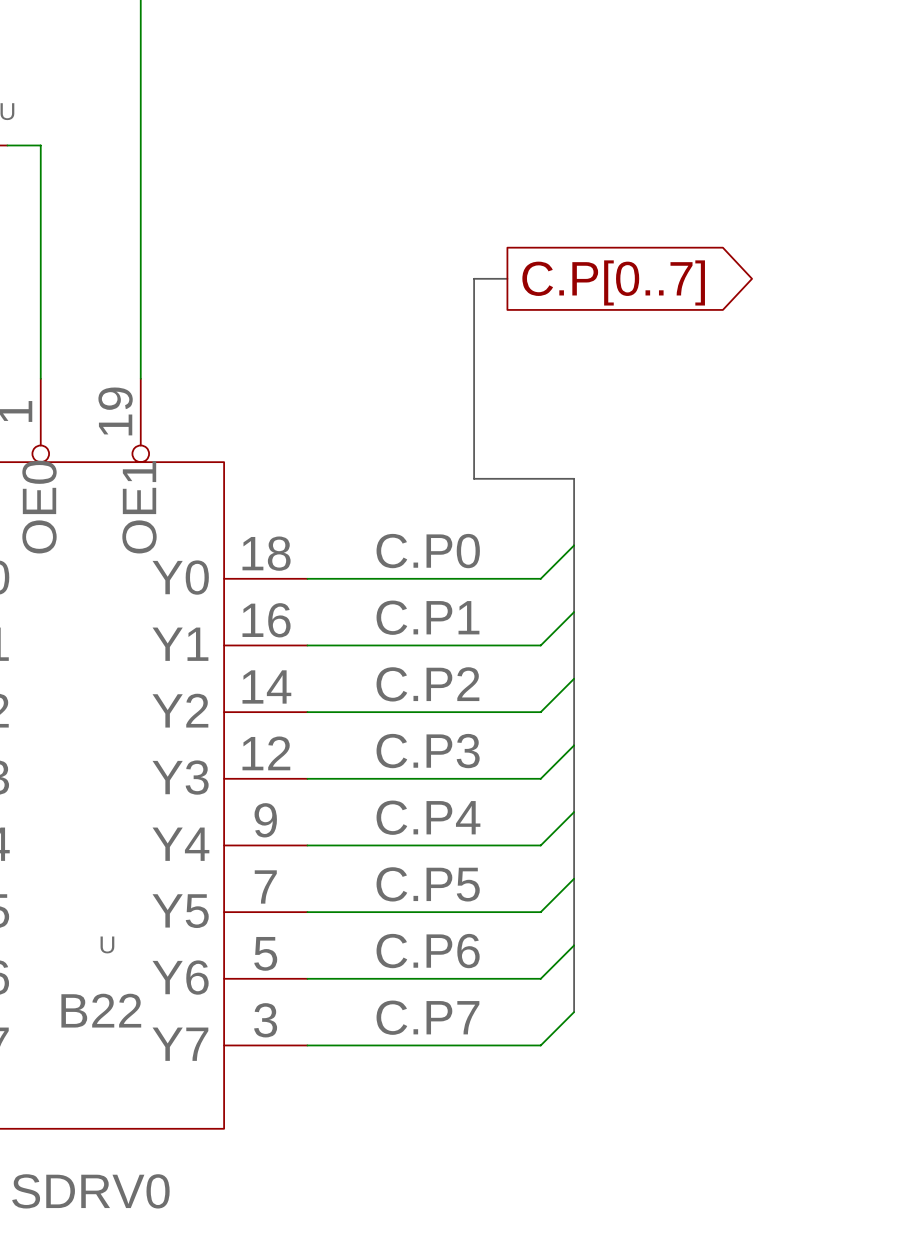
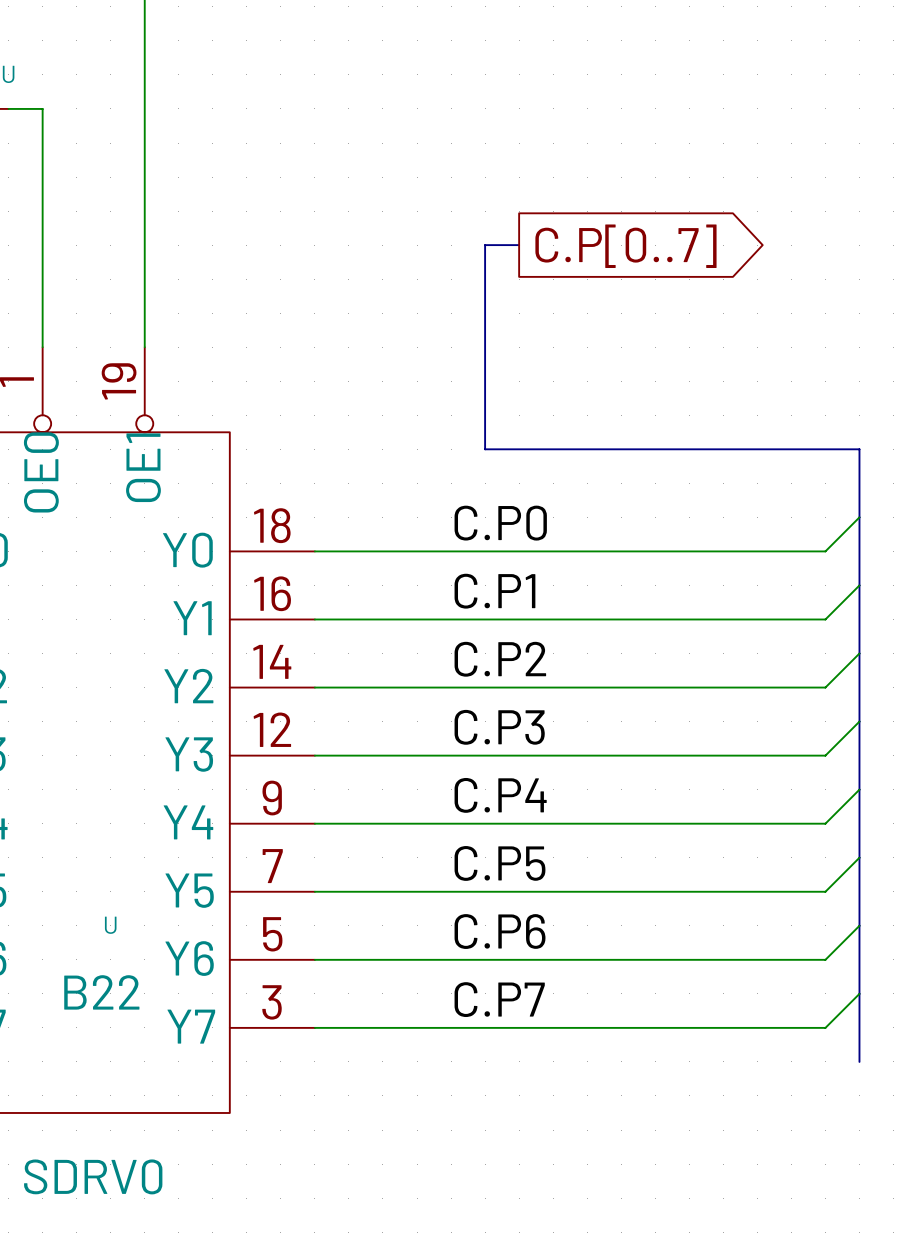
bus: (574, 478) (574, 1012) -> (587, 449) (859, 449) (859, 1061)
wire: (574, 545) (540, 578) -> (859, 517) (825, 551) (553, 551)
label position: C.P0 (428, 551) -> C.P0 (500, 523)
wire: (574, 612) (540, 645) -> (859, 585) (825, 619) (553, 619)
label position: C.P1 (427, 617) -> C.P1 (494, 591)
wire: (574, 678) (540, 712) -> (859, 653) (825, 687) (553, 687)
label position: C.P2 (427, 684) -> C.P2 (500, 659)
wire: (574, 745) (540, 778) -> (859, 721) (825, 755) (553, 755)
label position: C.P3 (428, 751) -> C.P3 (499, 727)
wire: (574, 812) (540, 845) -> (859, 789) (825, 823) (553, 823)
label position: C.P4 (428, 817) -> C.P4 (500, 795)
wire: (574, 878) (540, 912) -> (859, 857) (825, 891) (553, 891)
label position: C.P5 (428, 884) -> C.P5 (499, 863)
wire: (574, 945) (540, 978) -> (859, 925) (825, 959) (553, 959)
label position: C.P6 (428, 951) -> C.P6 (500, 931)
wire: (574, 1012) (540, 1045) -> (859, 993) (825, 1027) (553, 1027)
label position: C.P7 (427, 1017) -> C.P7 (499, 999)

